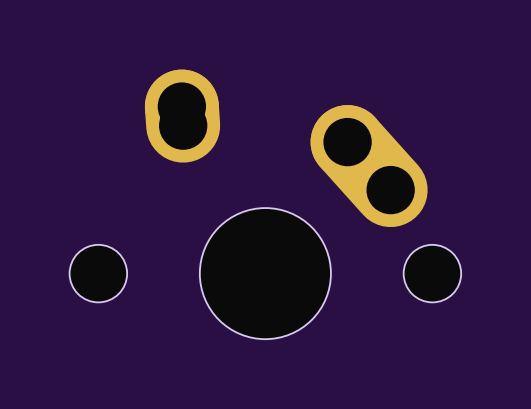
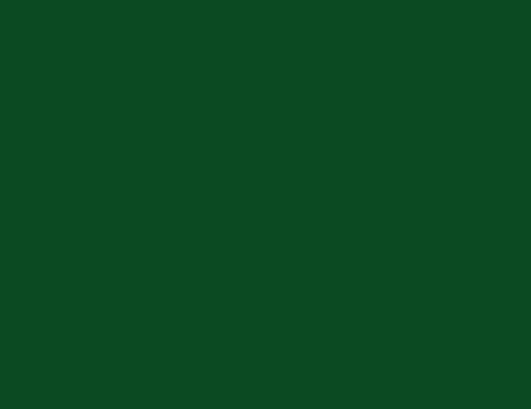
part: (265, 204) -> none

